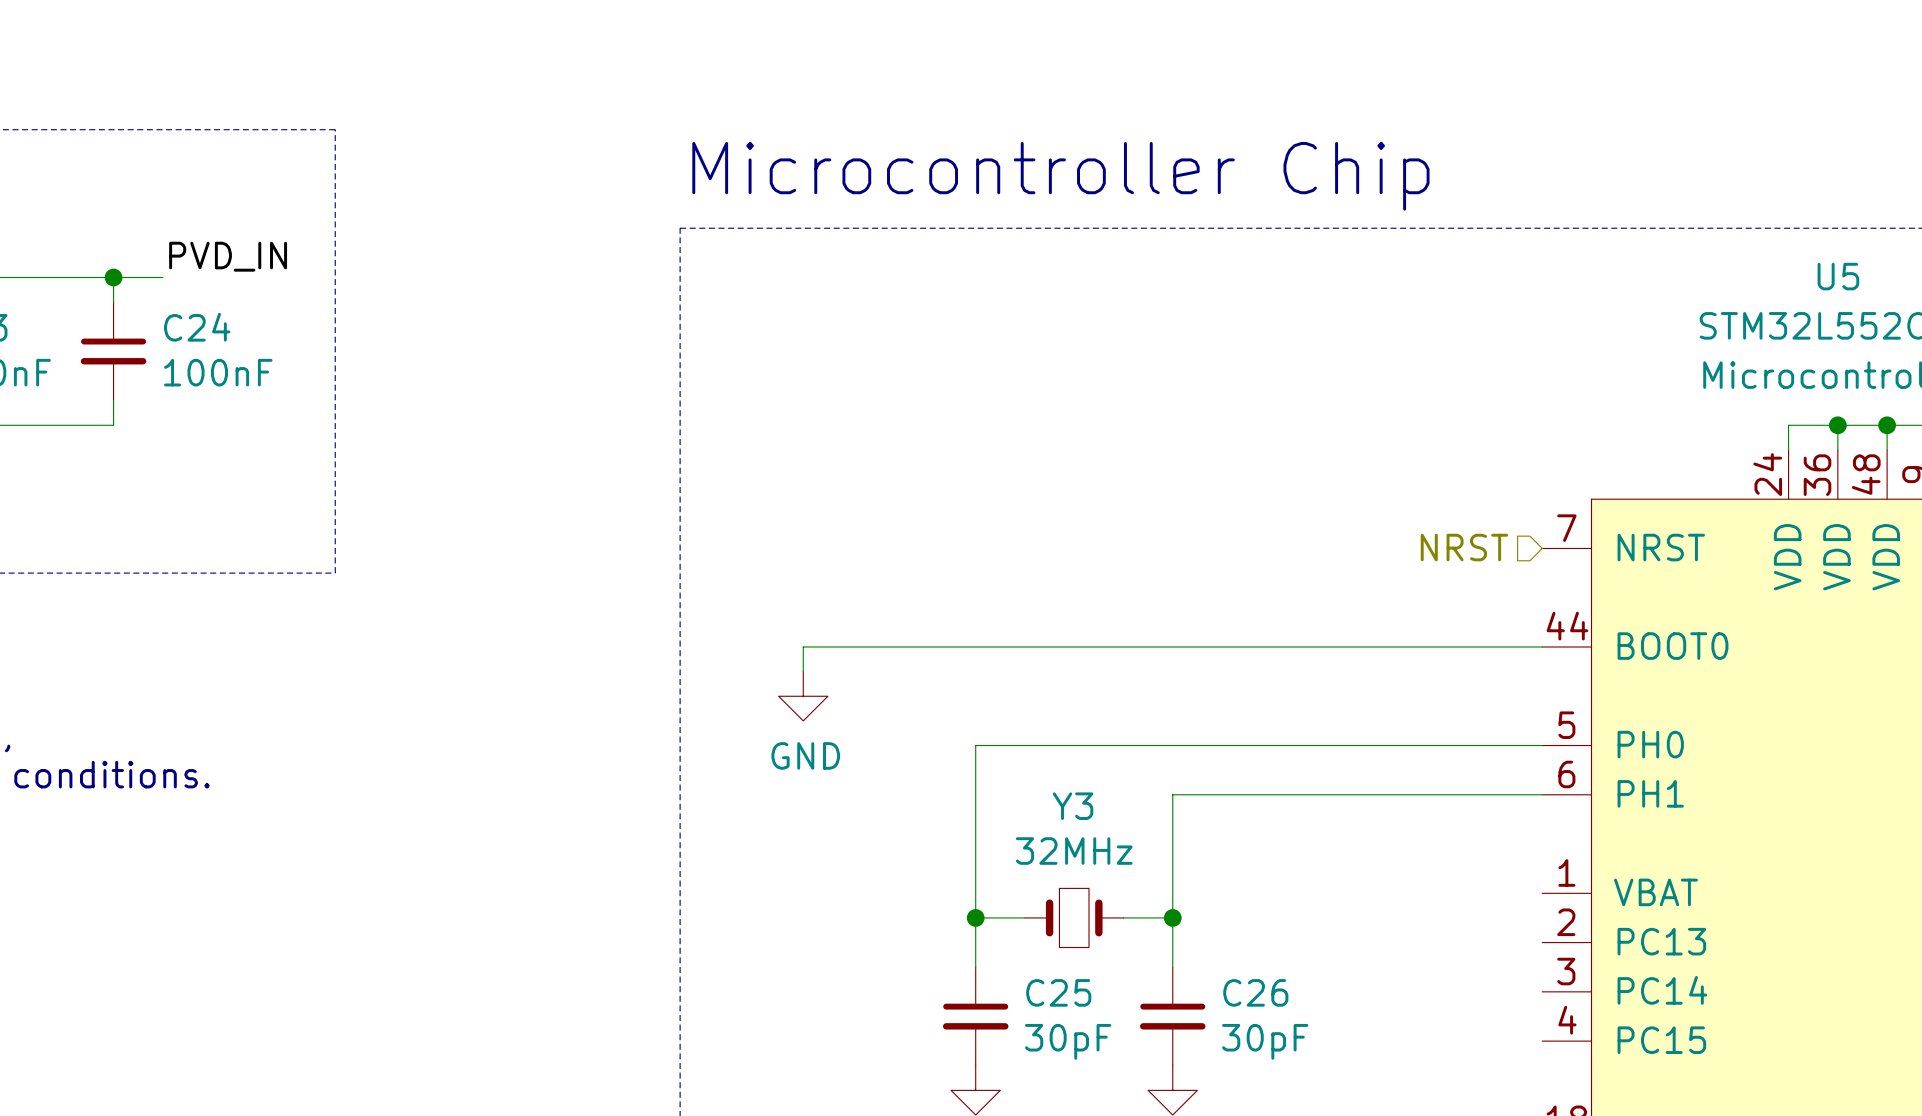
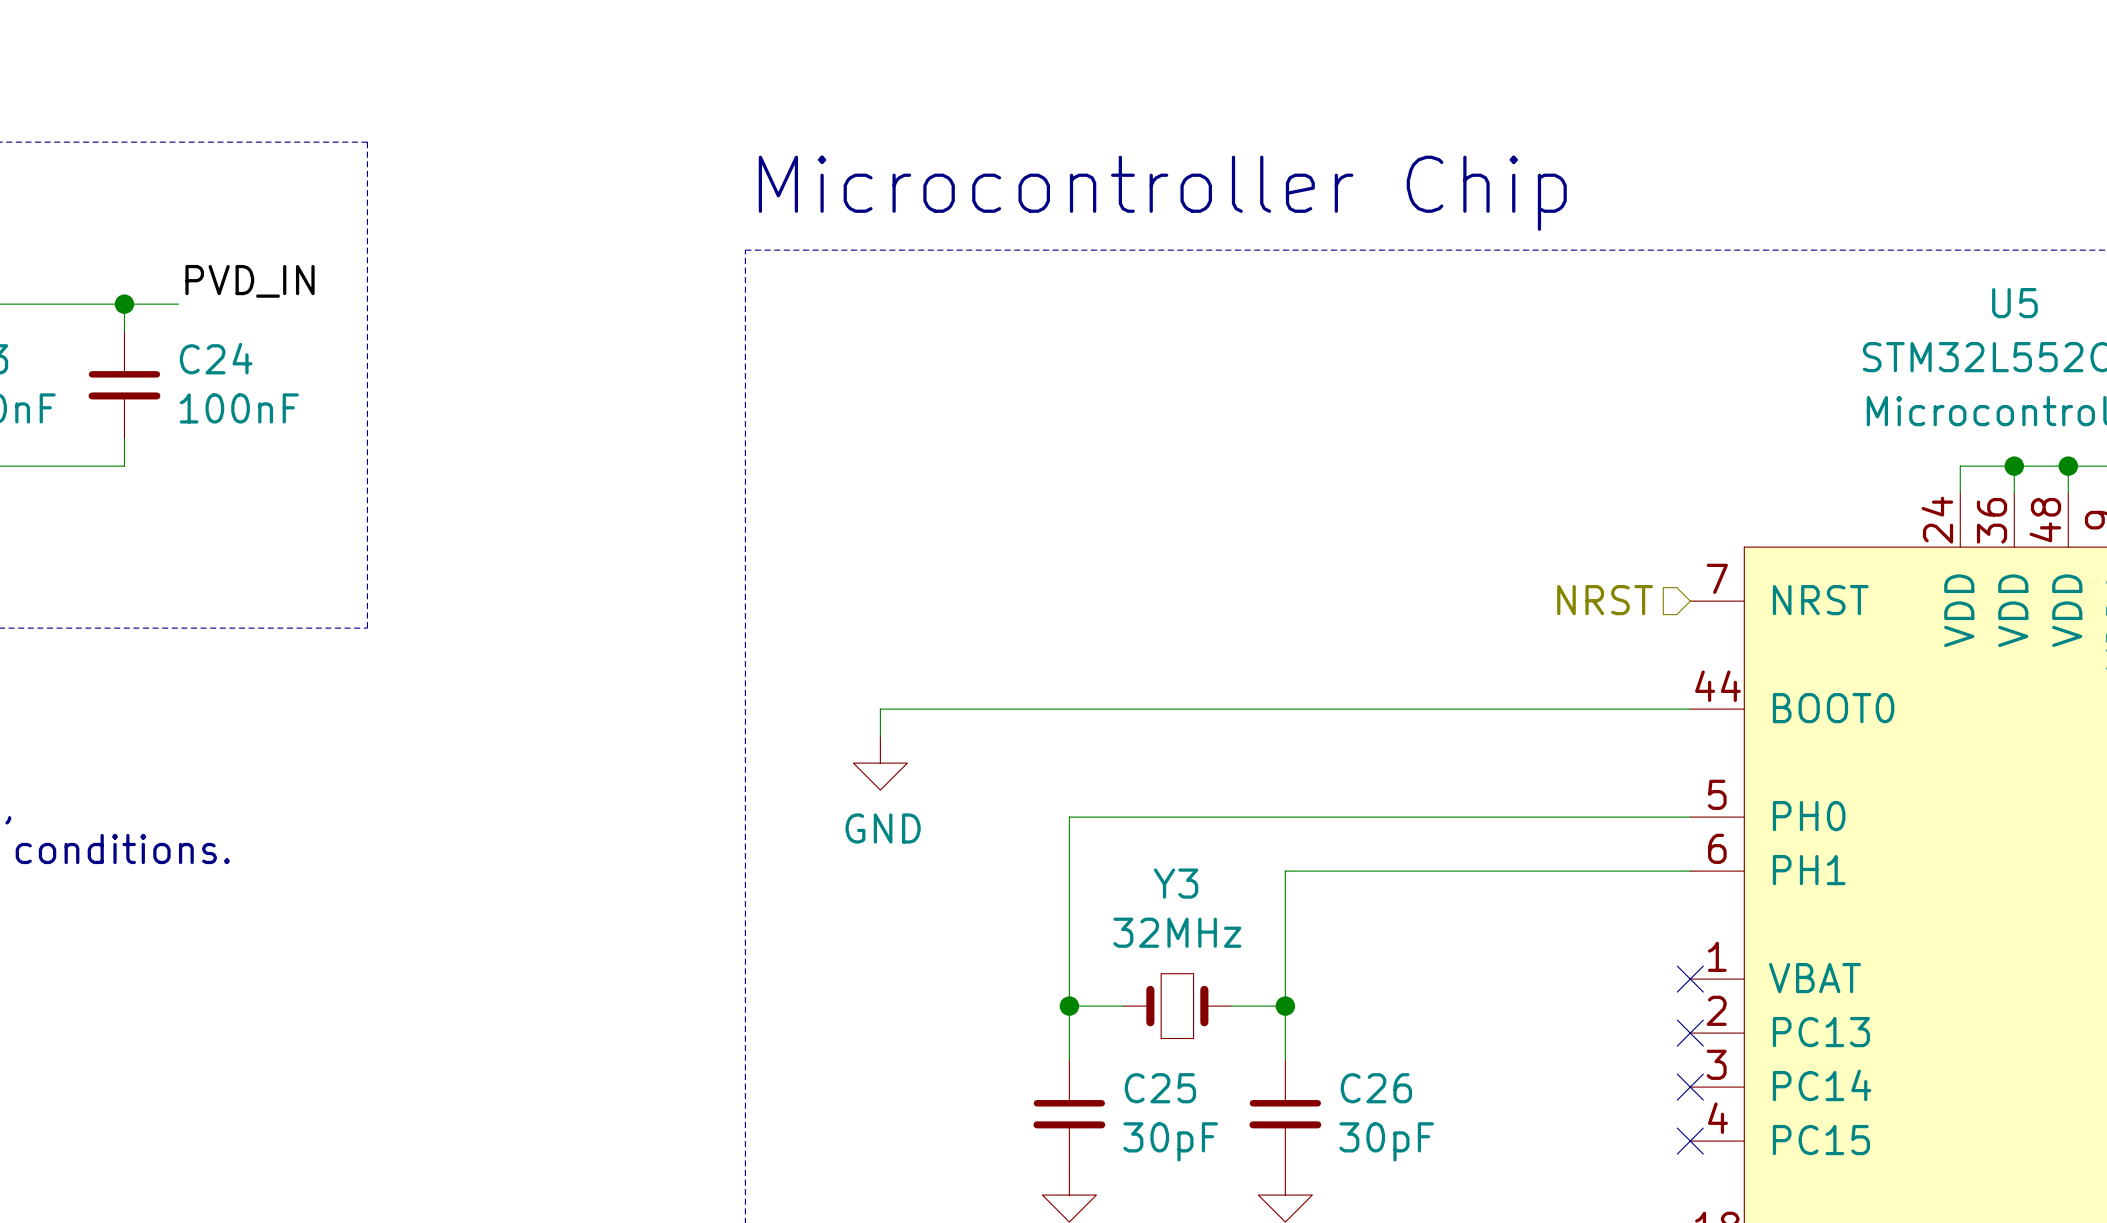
no-connect mark: none -> (1690, 979)
no-connect mark: none -> (1690, 1033)
no-connect mark: none -> (1690, 1087)
no-connect mark: none -> (1690, 1141)

